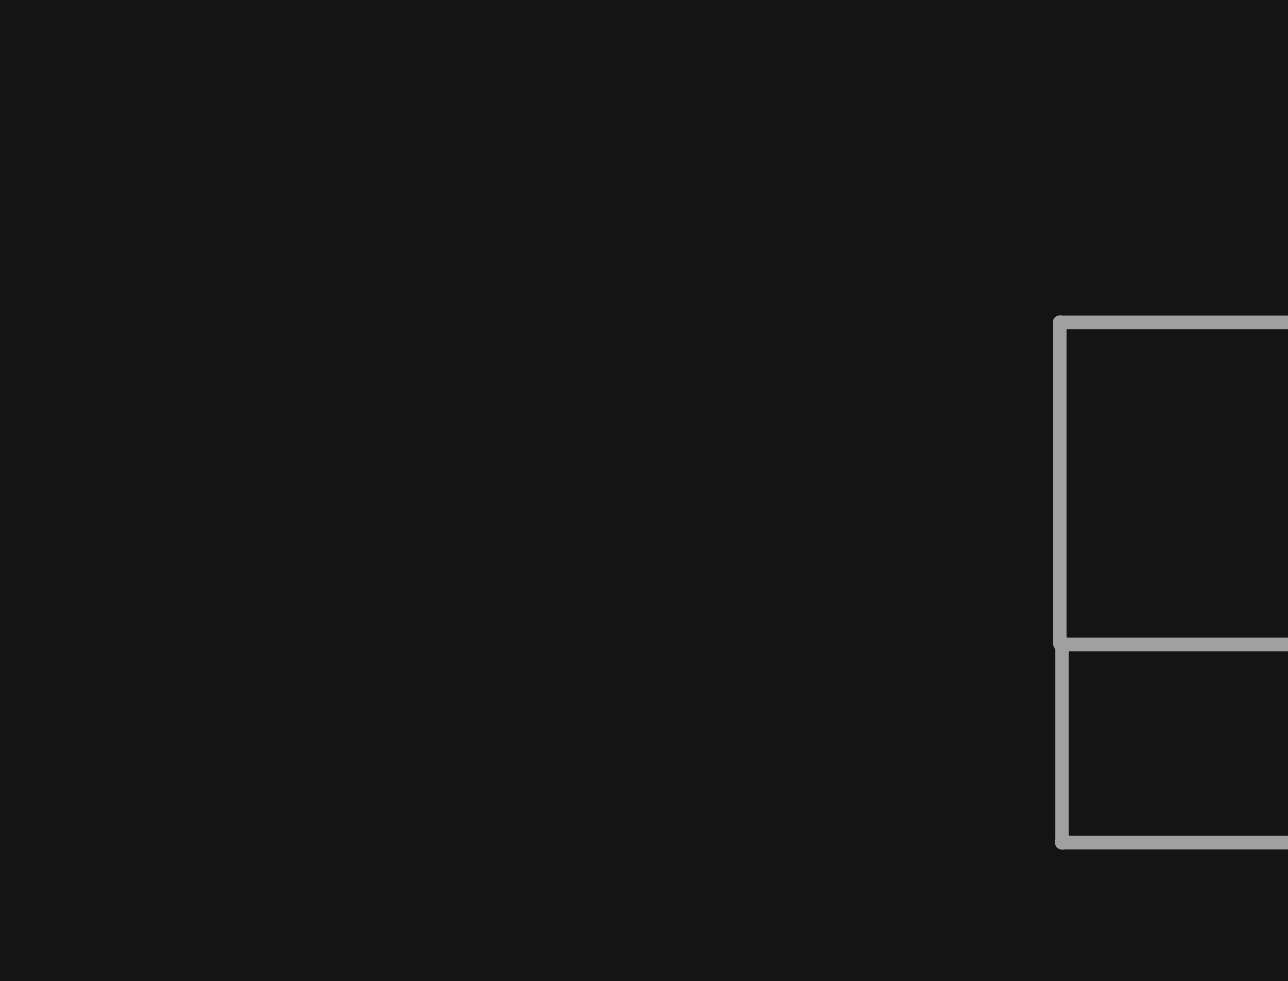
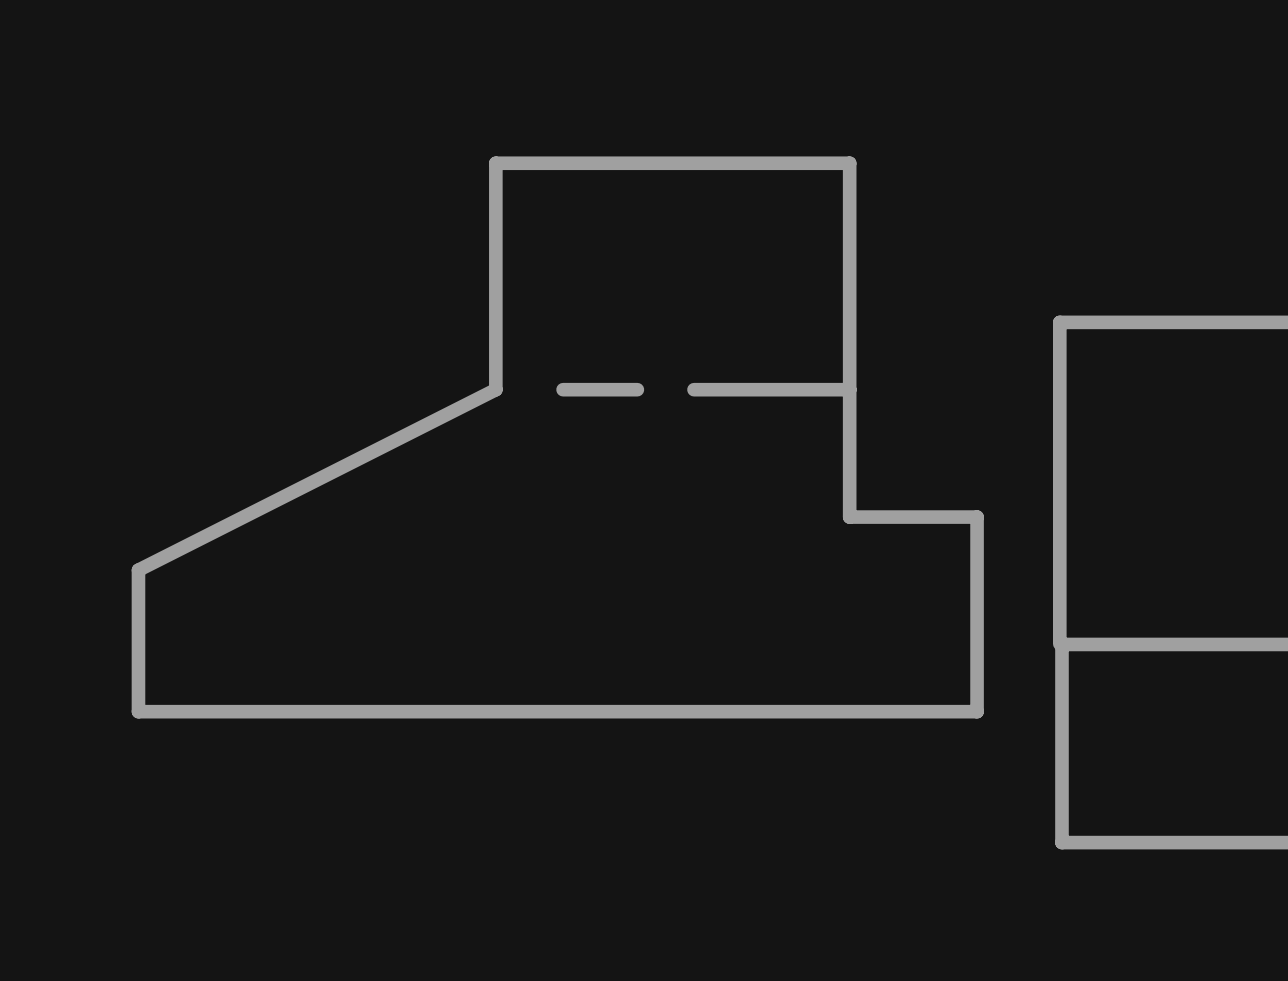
board edge: none -> (849, 163) (495, 163) (495, 389) (138, 570) (138, 711) (977, 711) (977, 517) (849, 517) (849, 163)
board edge: none -> (637, 389) (563, 389)
board edge: none -> (849, 389) (693, 389)

